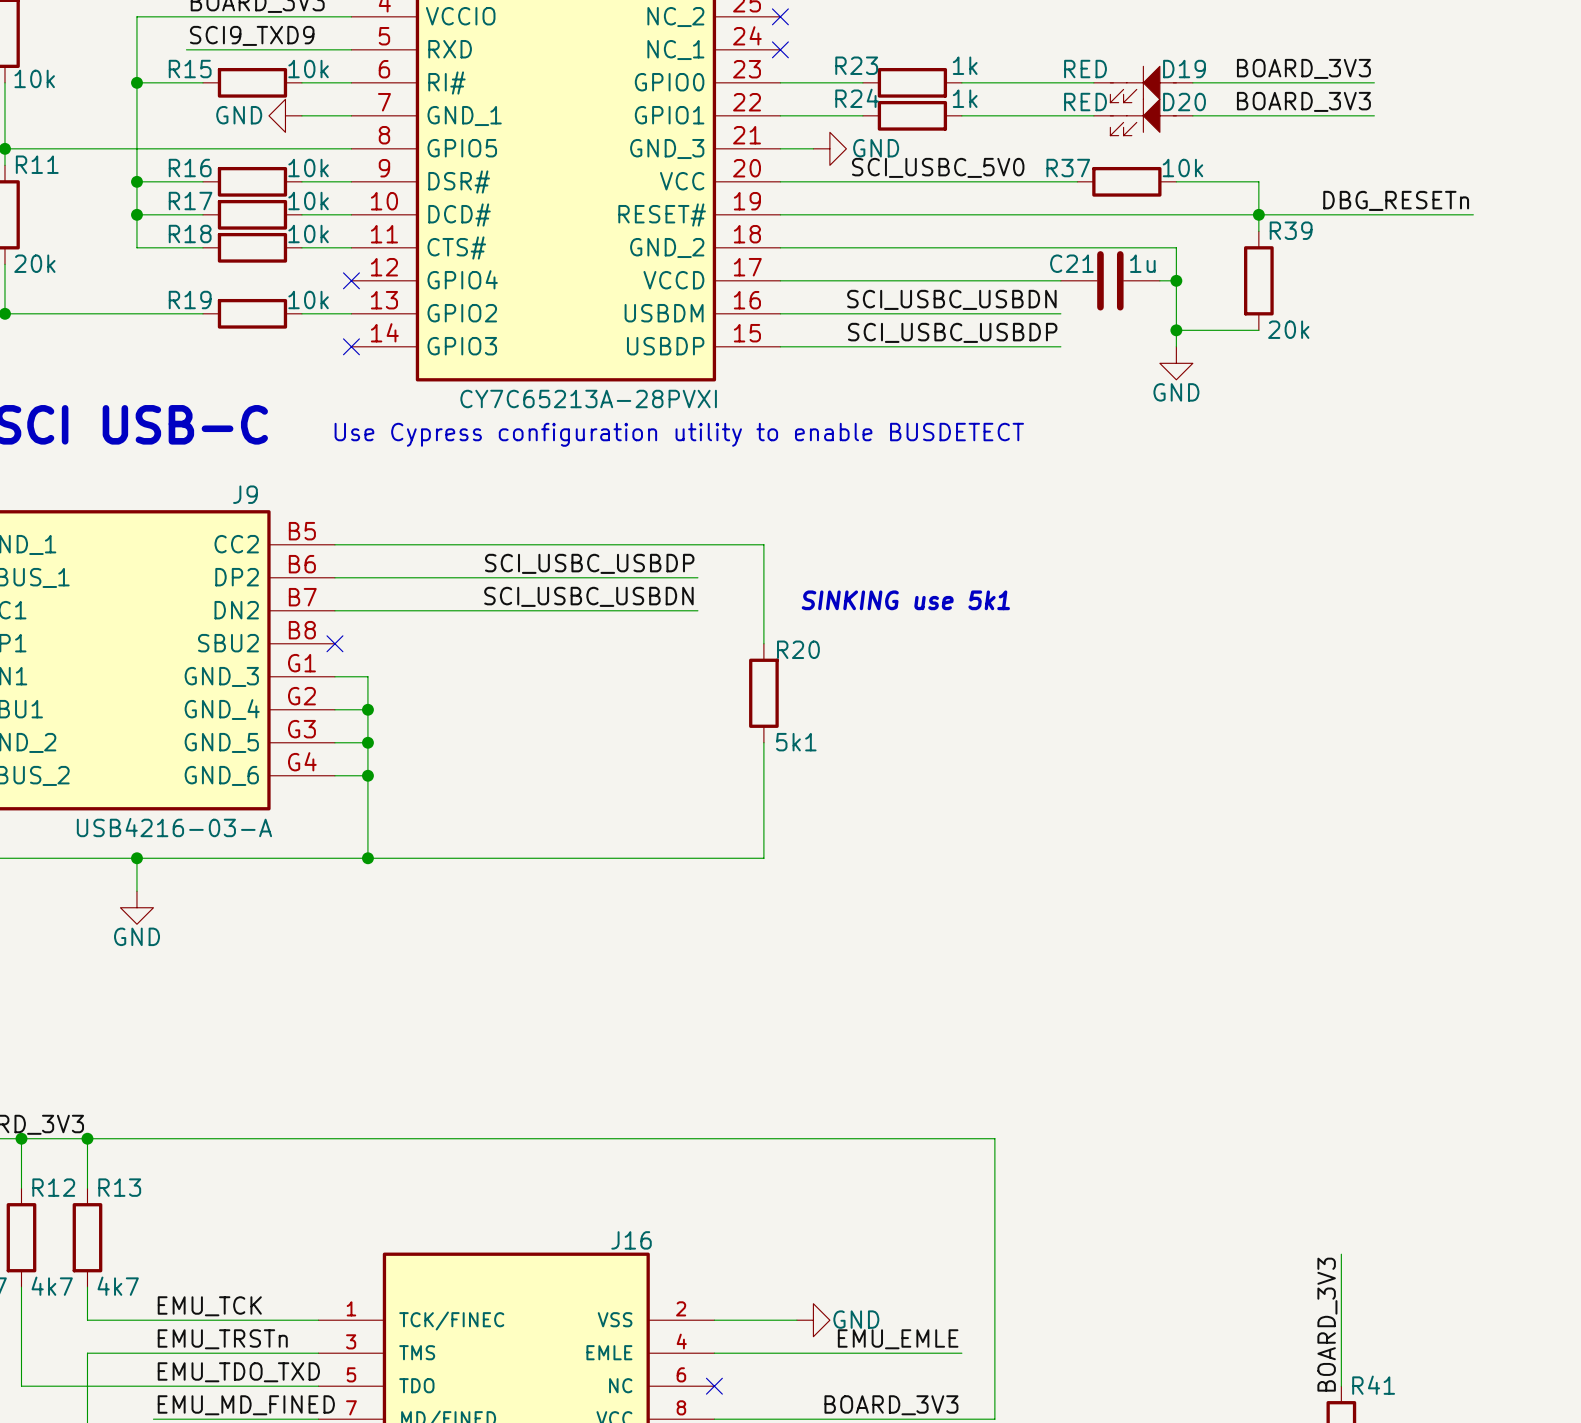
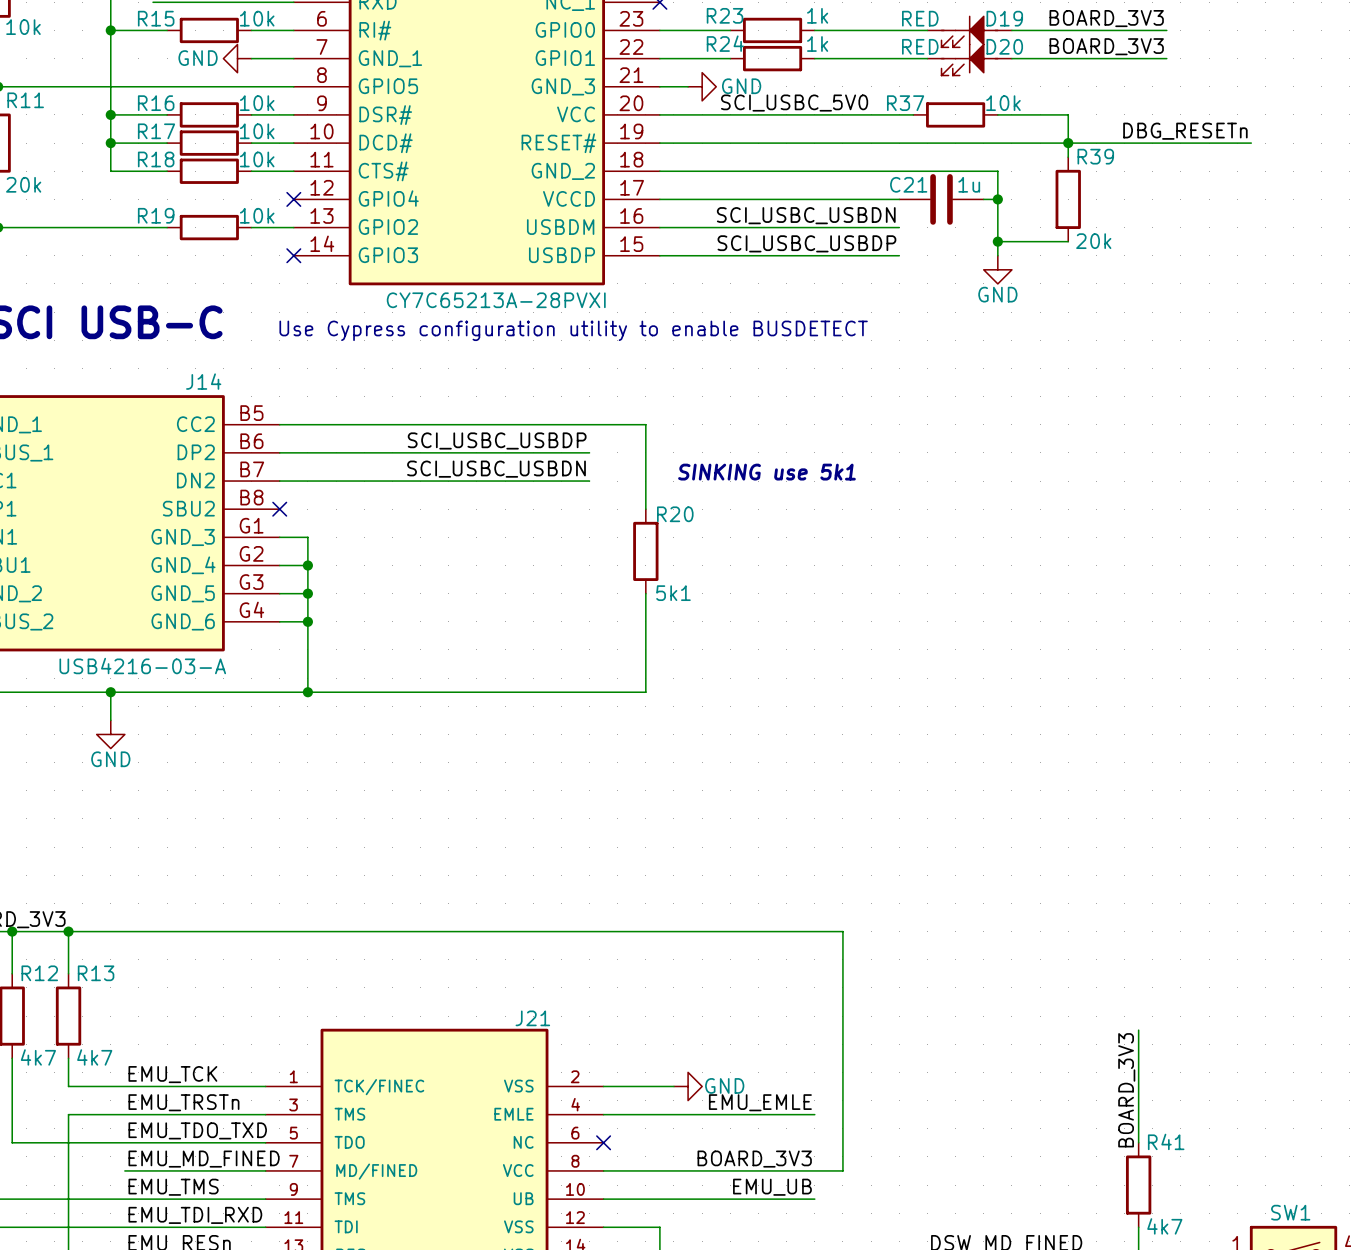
J9 name: J9 (245, 494) -> J14 (203, 381)
J16 name: J16 (631, 1240) -> J21 (532, 1018)

